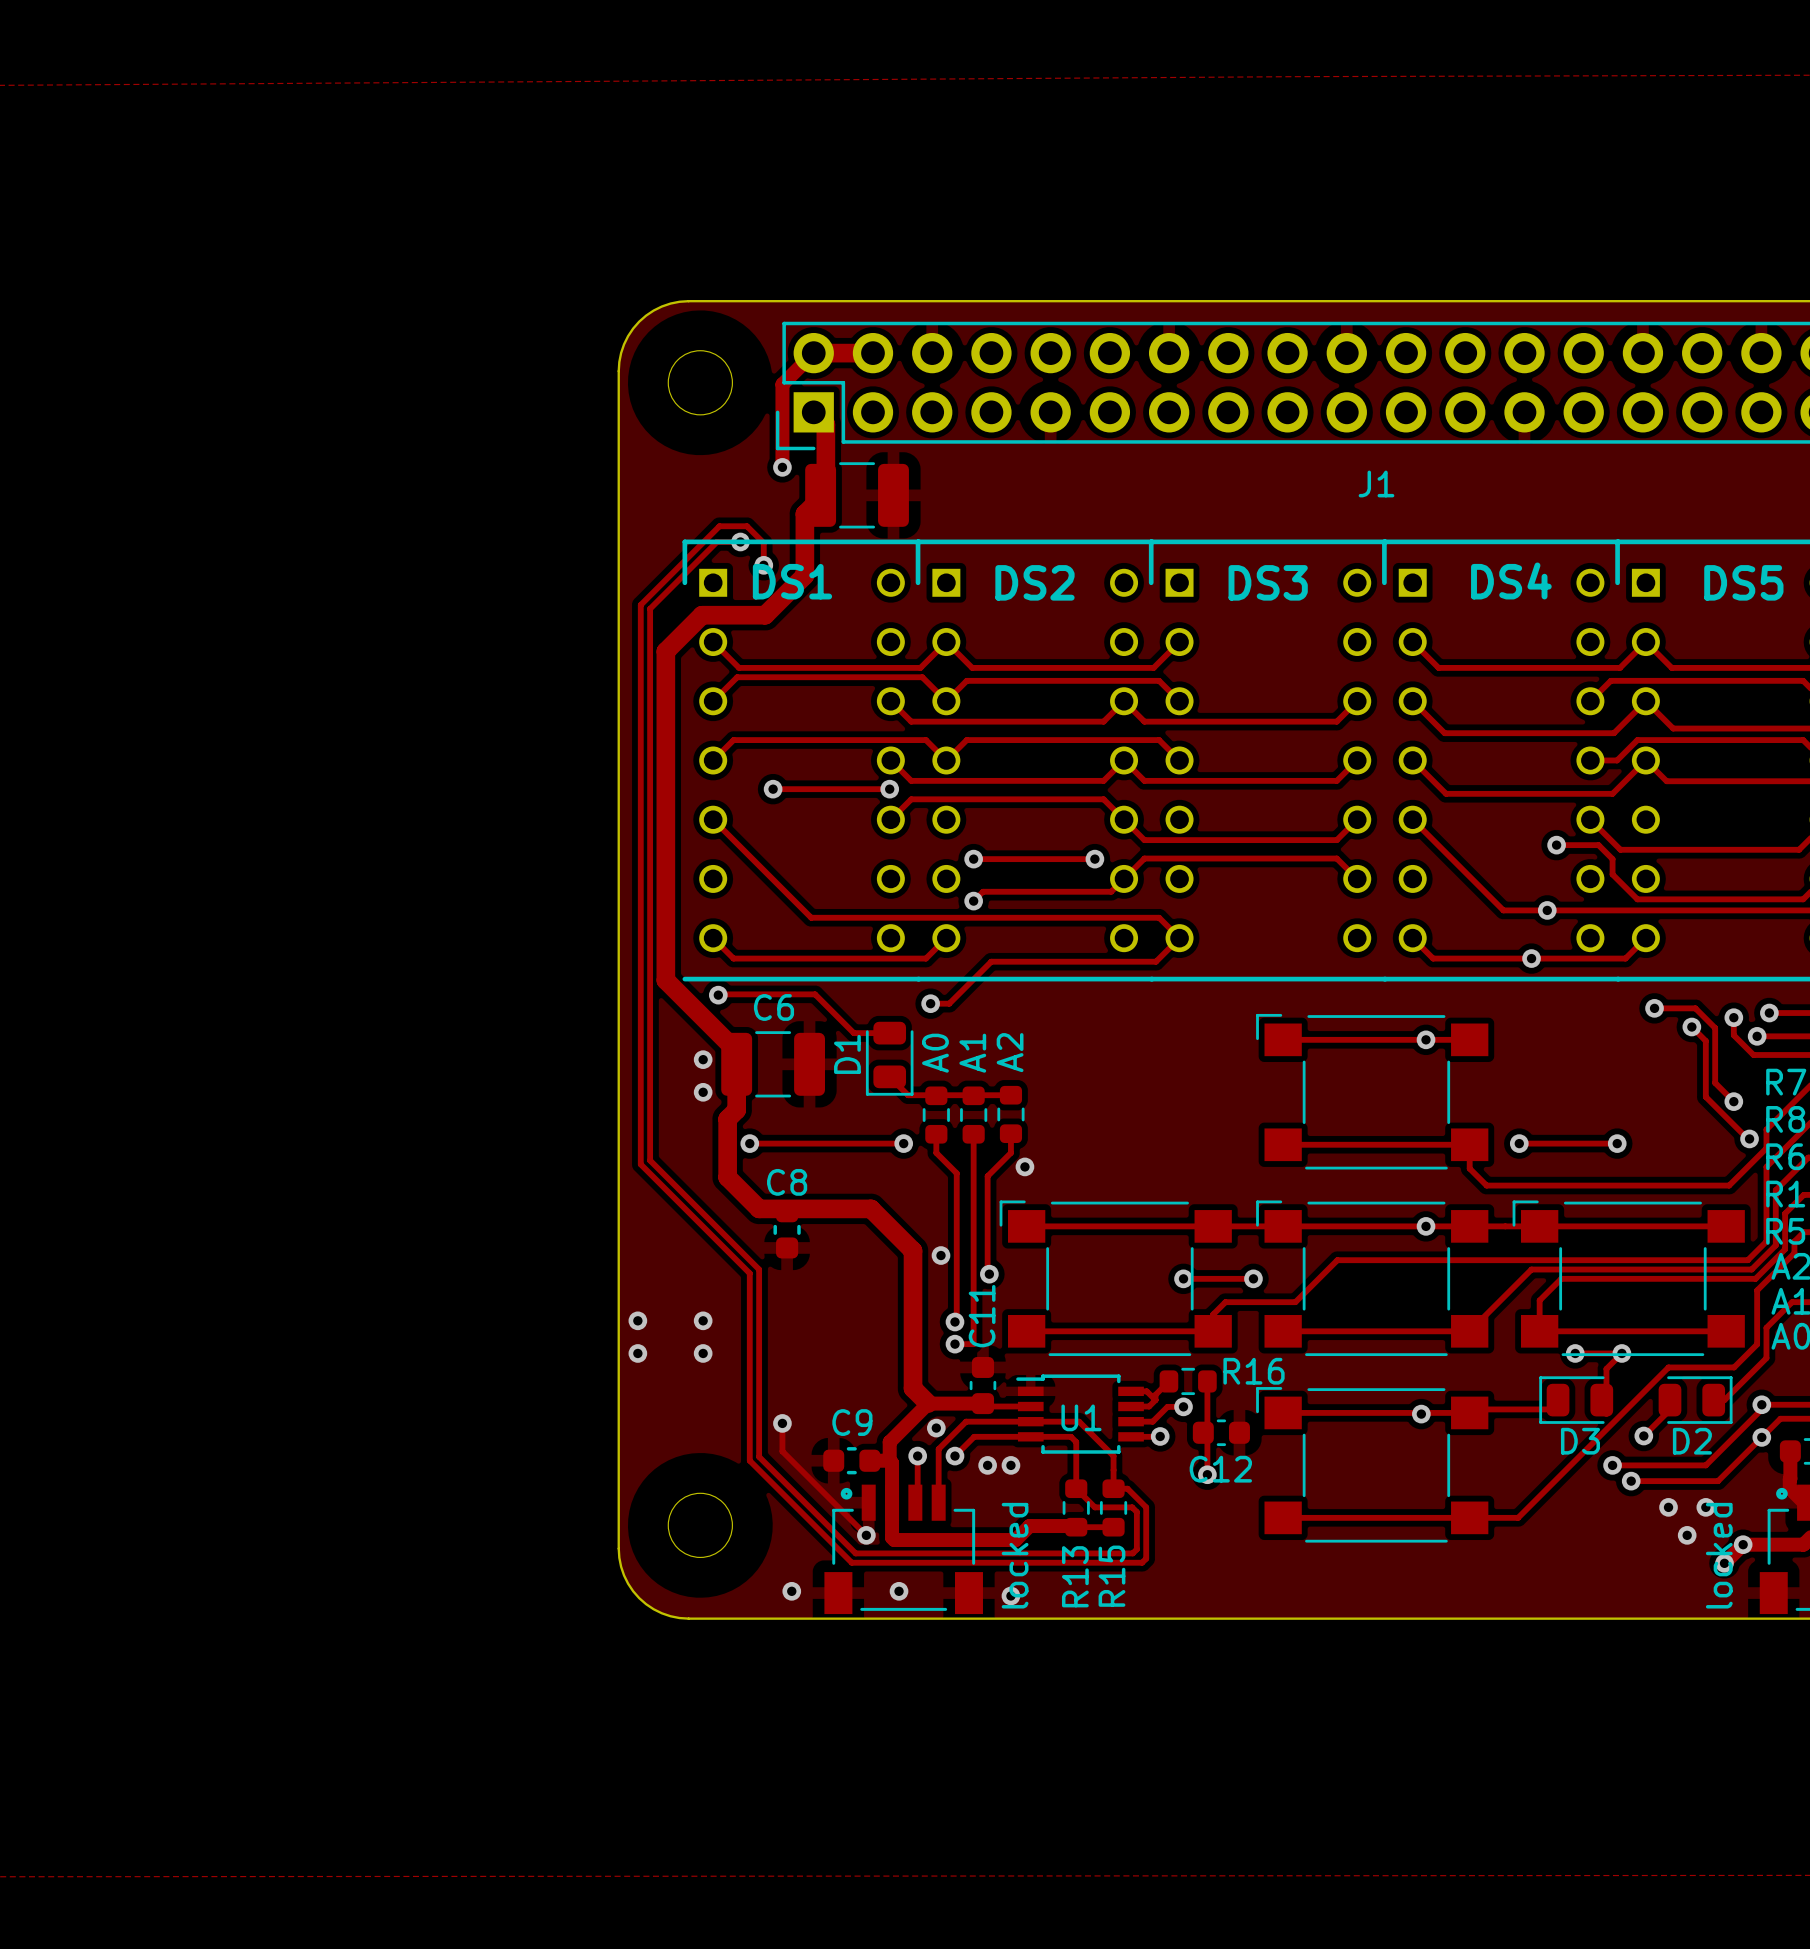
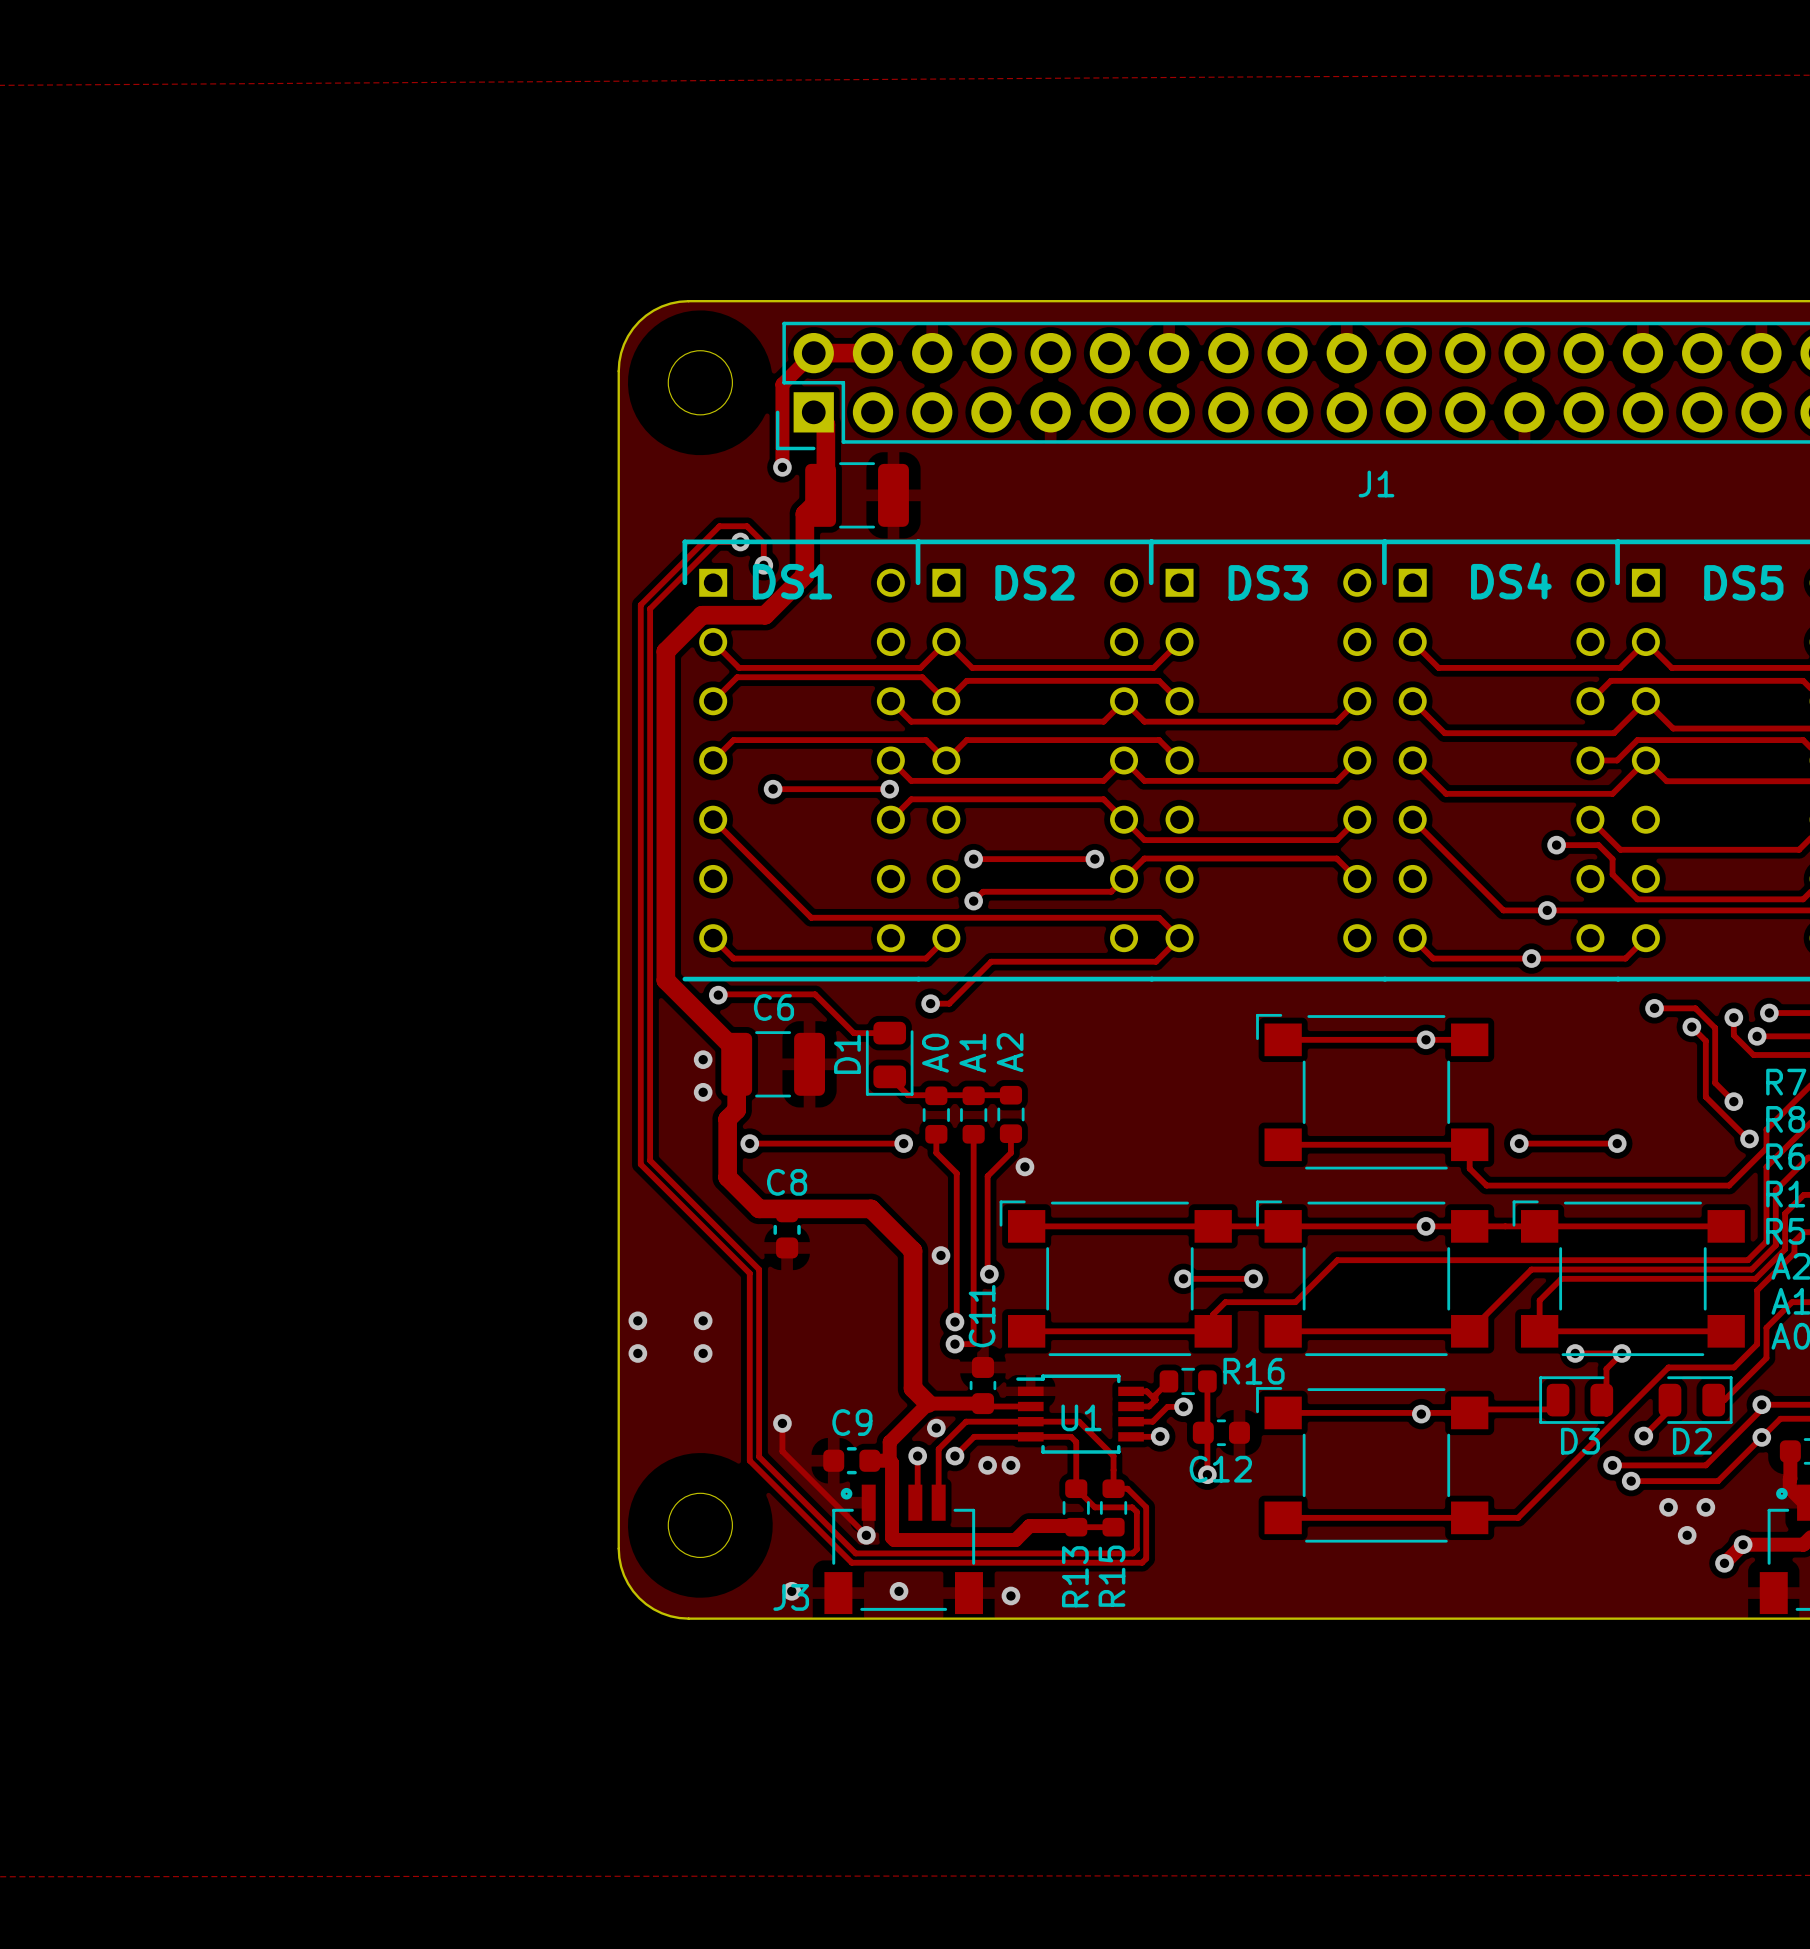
text: locked (1015, 1555) -> none
text: locked (1719, 1555) -> none
J3 name: none -> J3 (791, 1597)

